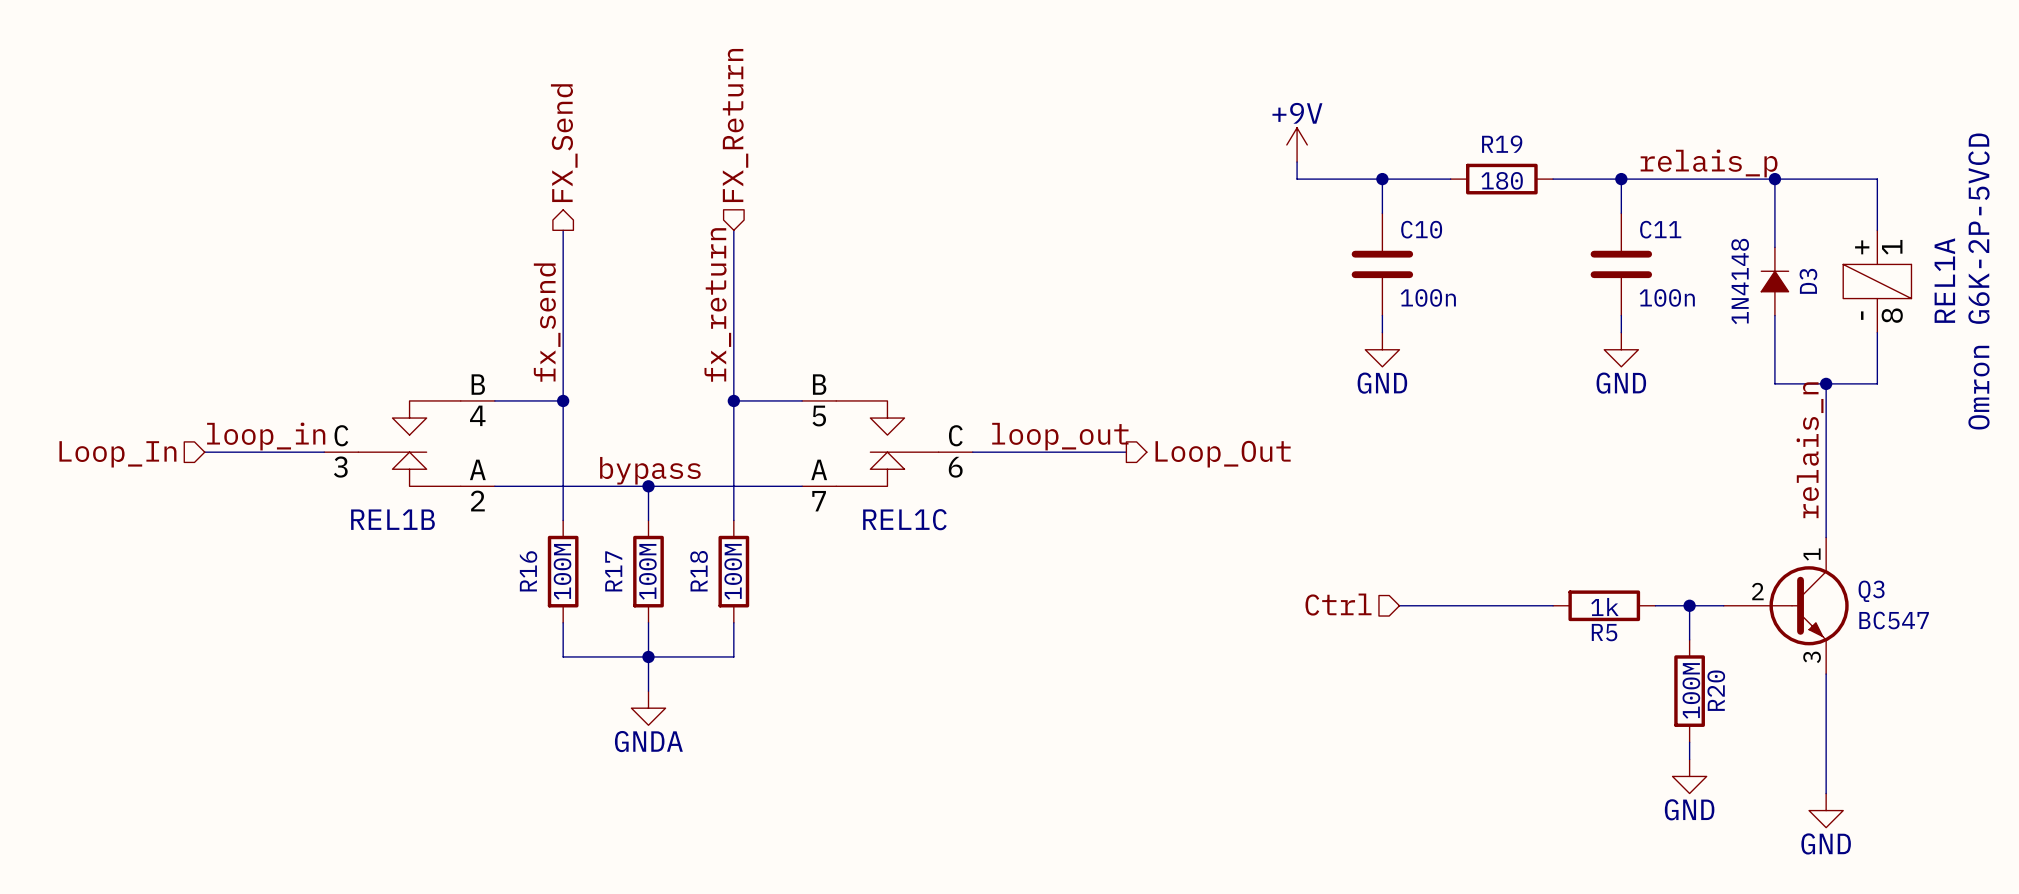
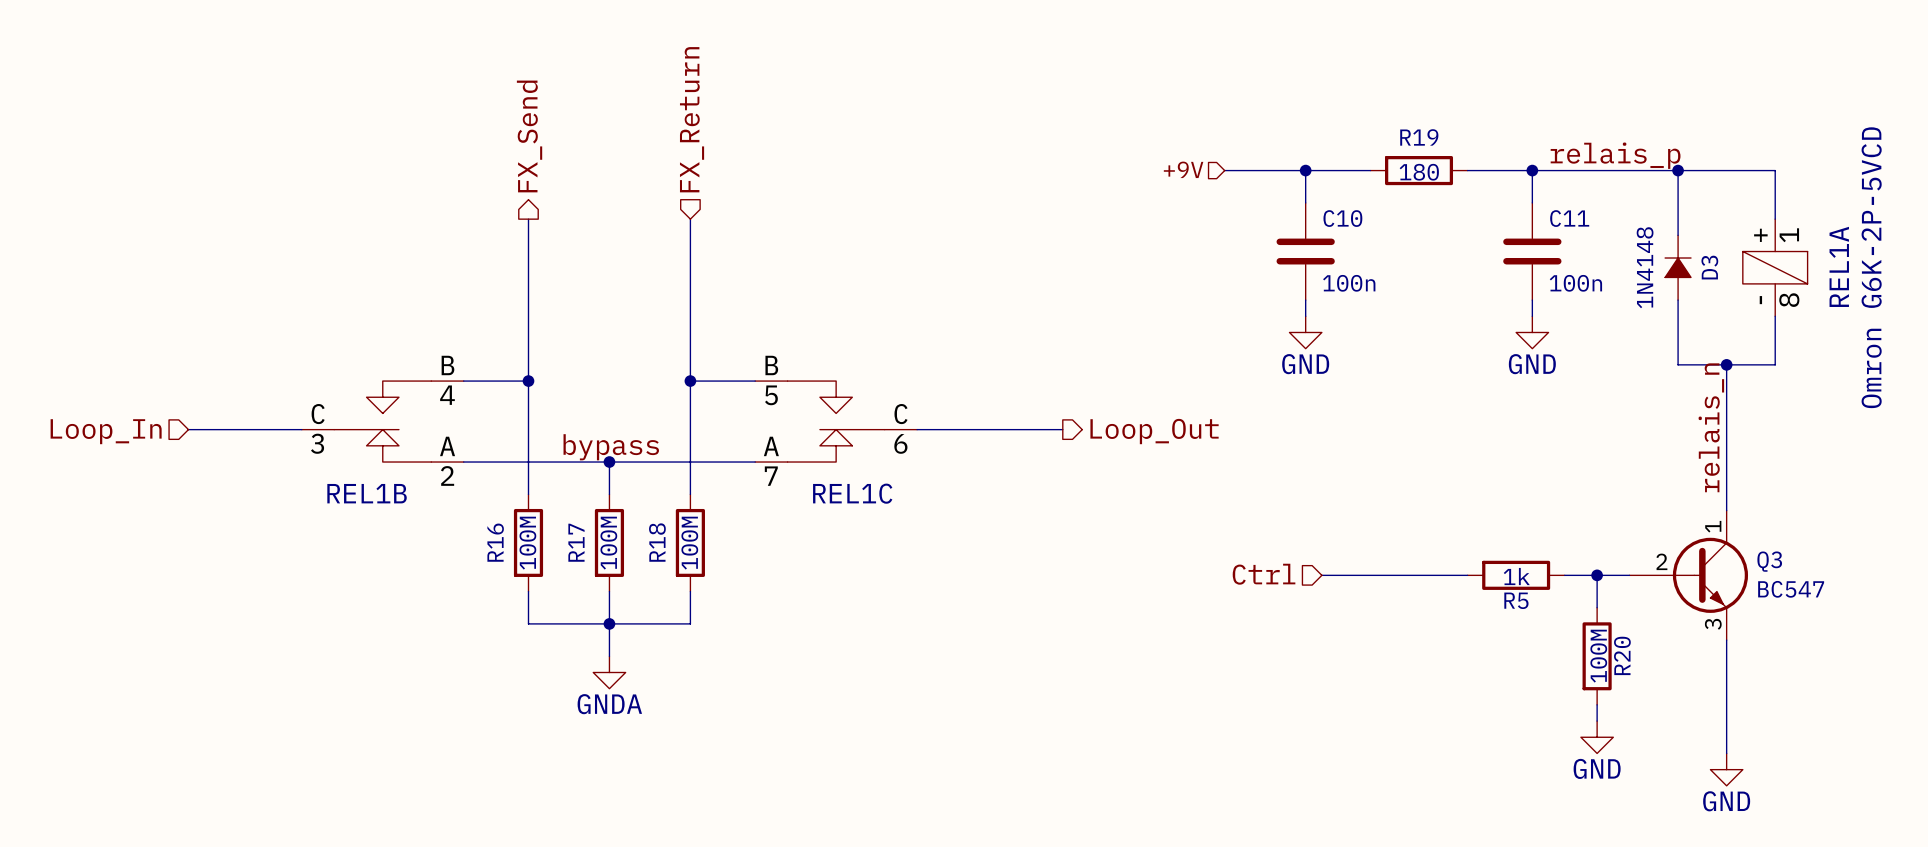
power symbol: +9V (1297, 144) -> none
wire: (1297, 162) (1297, 179) -> none
hierarchical label: none -> +9V (1183, 169)
label: fx_return (717, 304) -> none
label: fx_send (547, 322) -> none
label: loop_in (266, 436) -> none
label: loop_out (1060, 436) -> none

